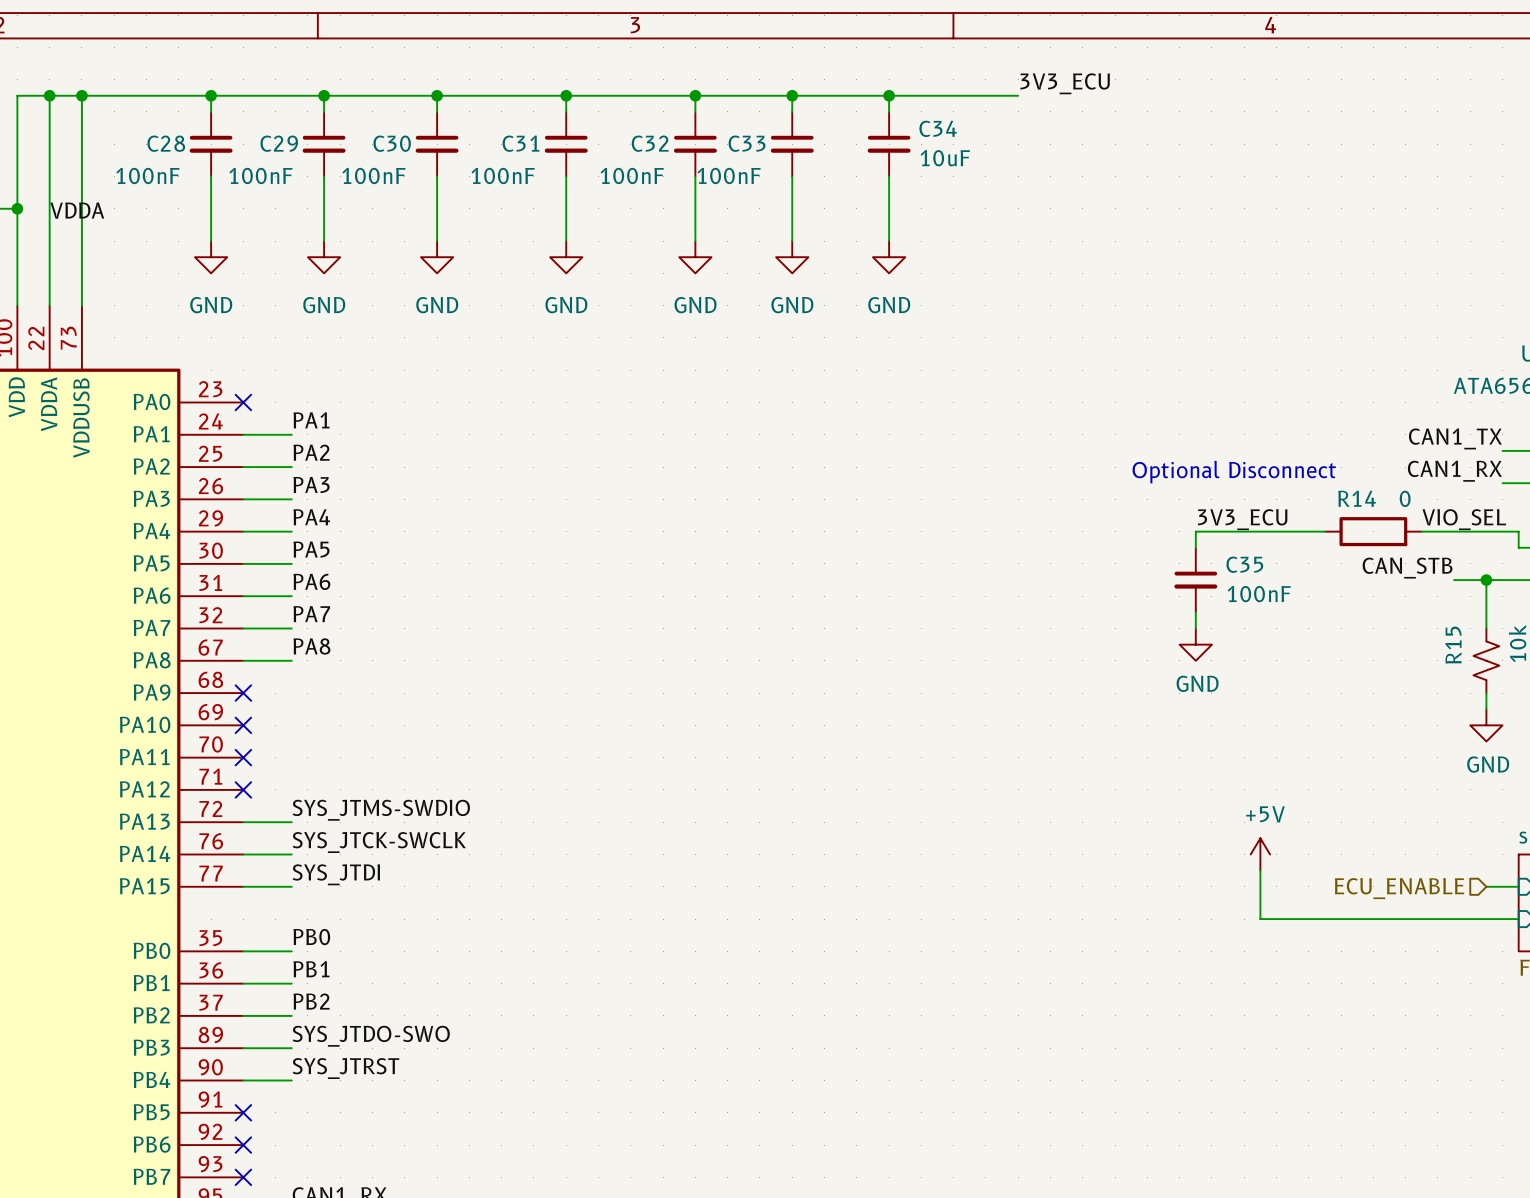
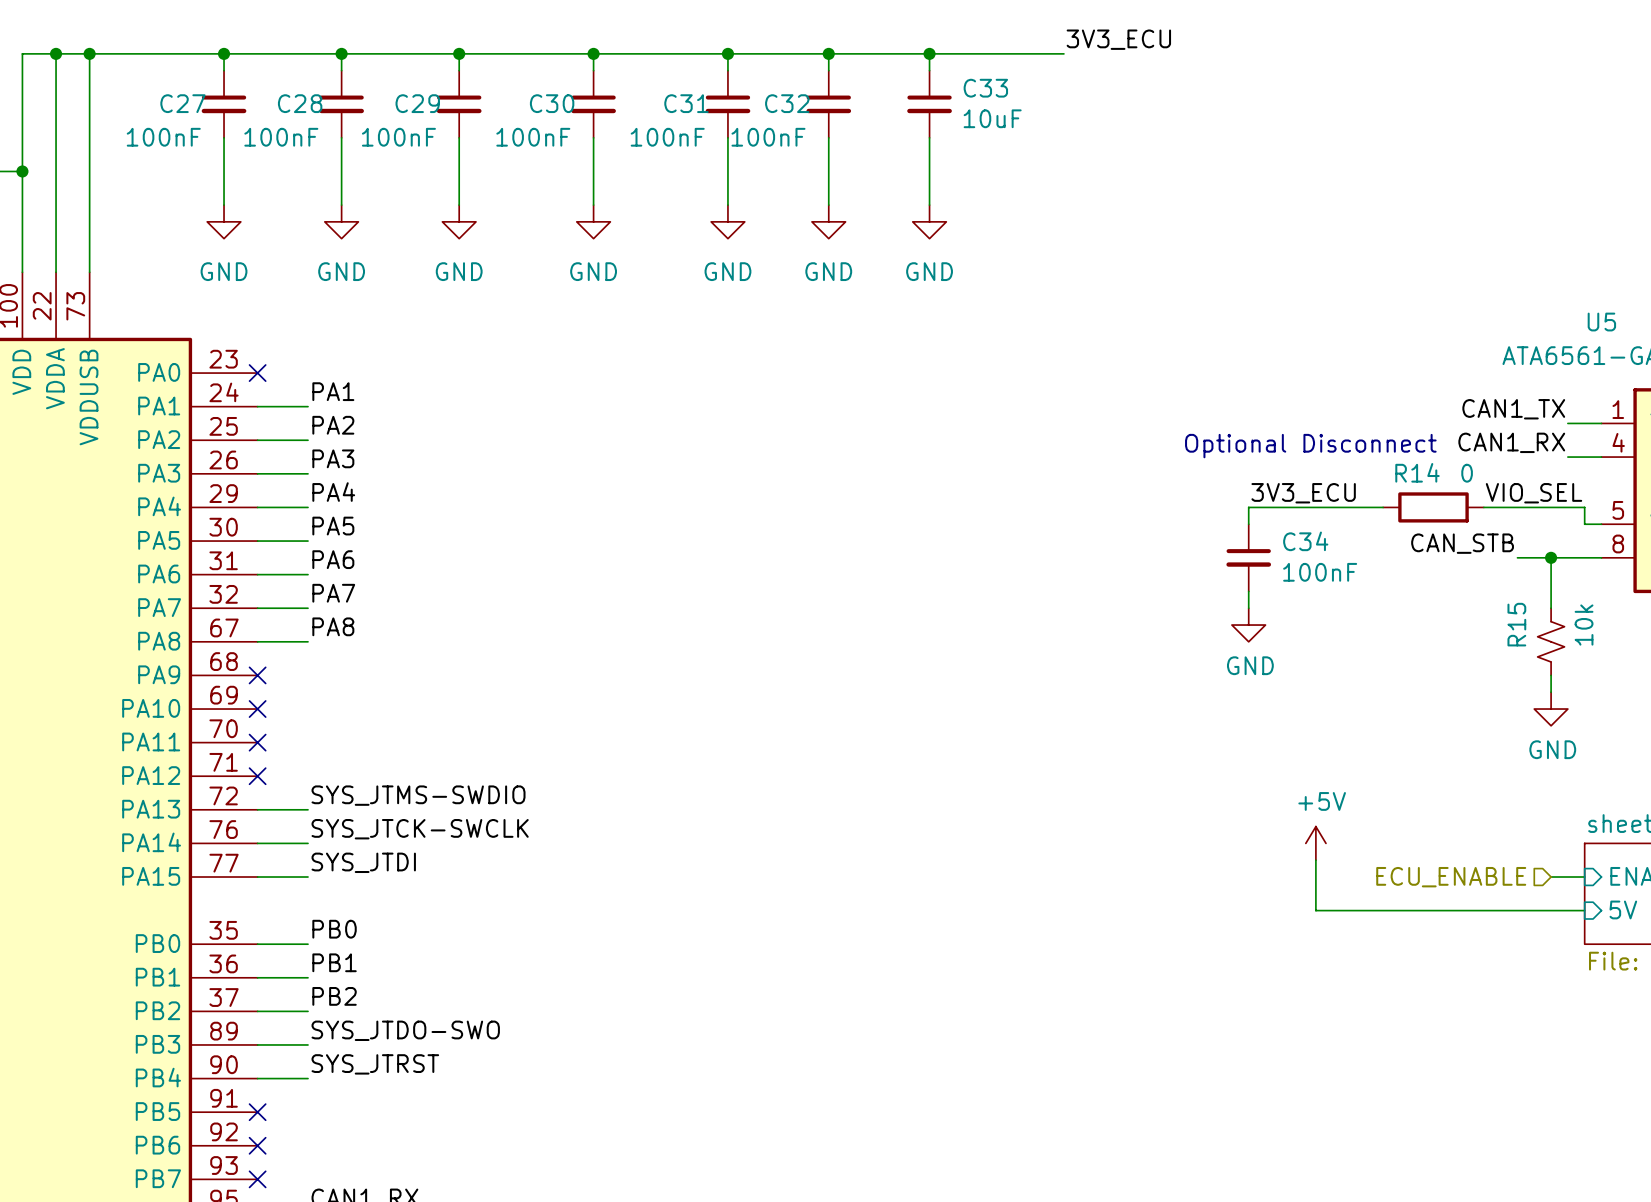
C34 name: C34 (938, 128) -> C33 (985, 88)
C28 name: C28 (166, 143) -> C27 (182, 103)
C29 name: C29 (279, 143) -> C28 (300, 103)
C30 name: C30 (392, 143) -> C29 (417, 103)
C31 name: C31 (520, 143) -> C30 (552, 103)
C32 name: C32 (650, 143) -> C31 (686, 103)
C33 name: C33 (747, 143) -> C32 (787, 103)
label: VDDA (77, 210) -> none
C35 name: C35 (1244, 564) -> C34 (1305, 541)

